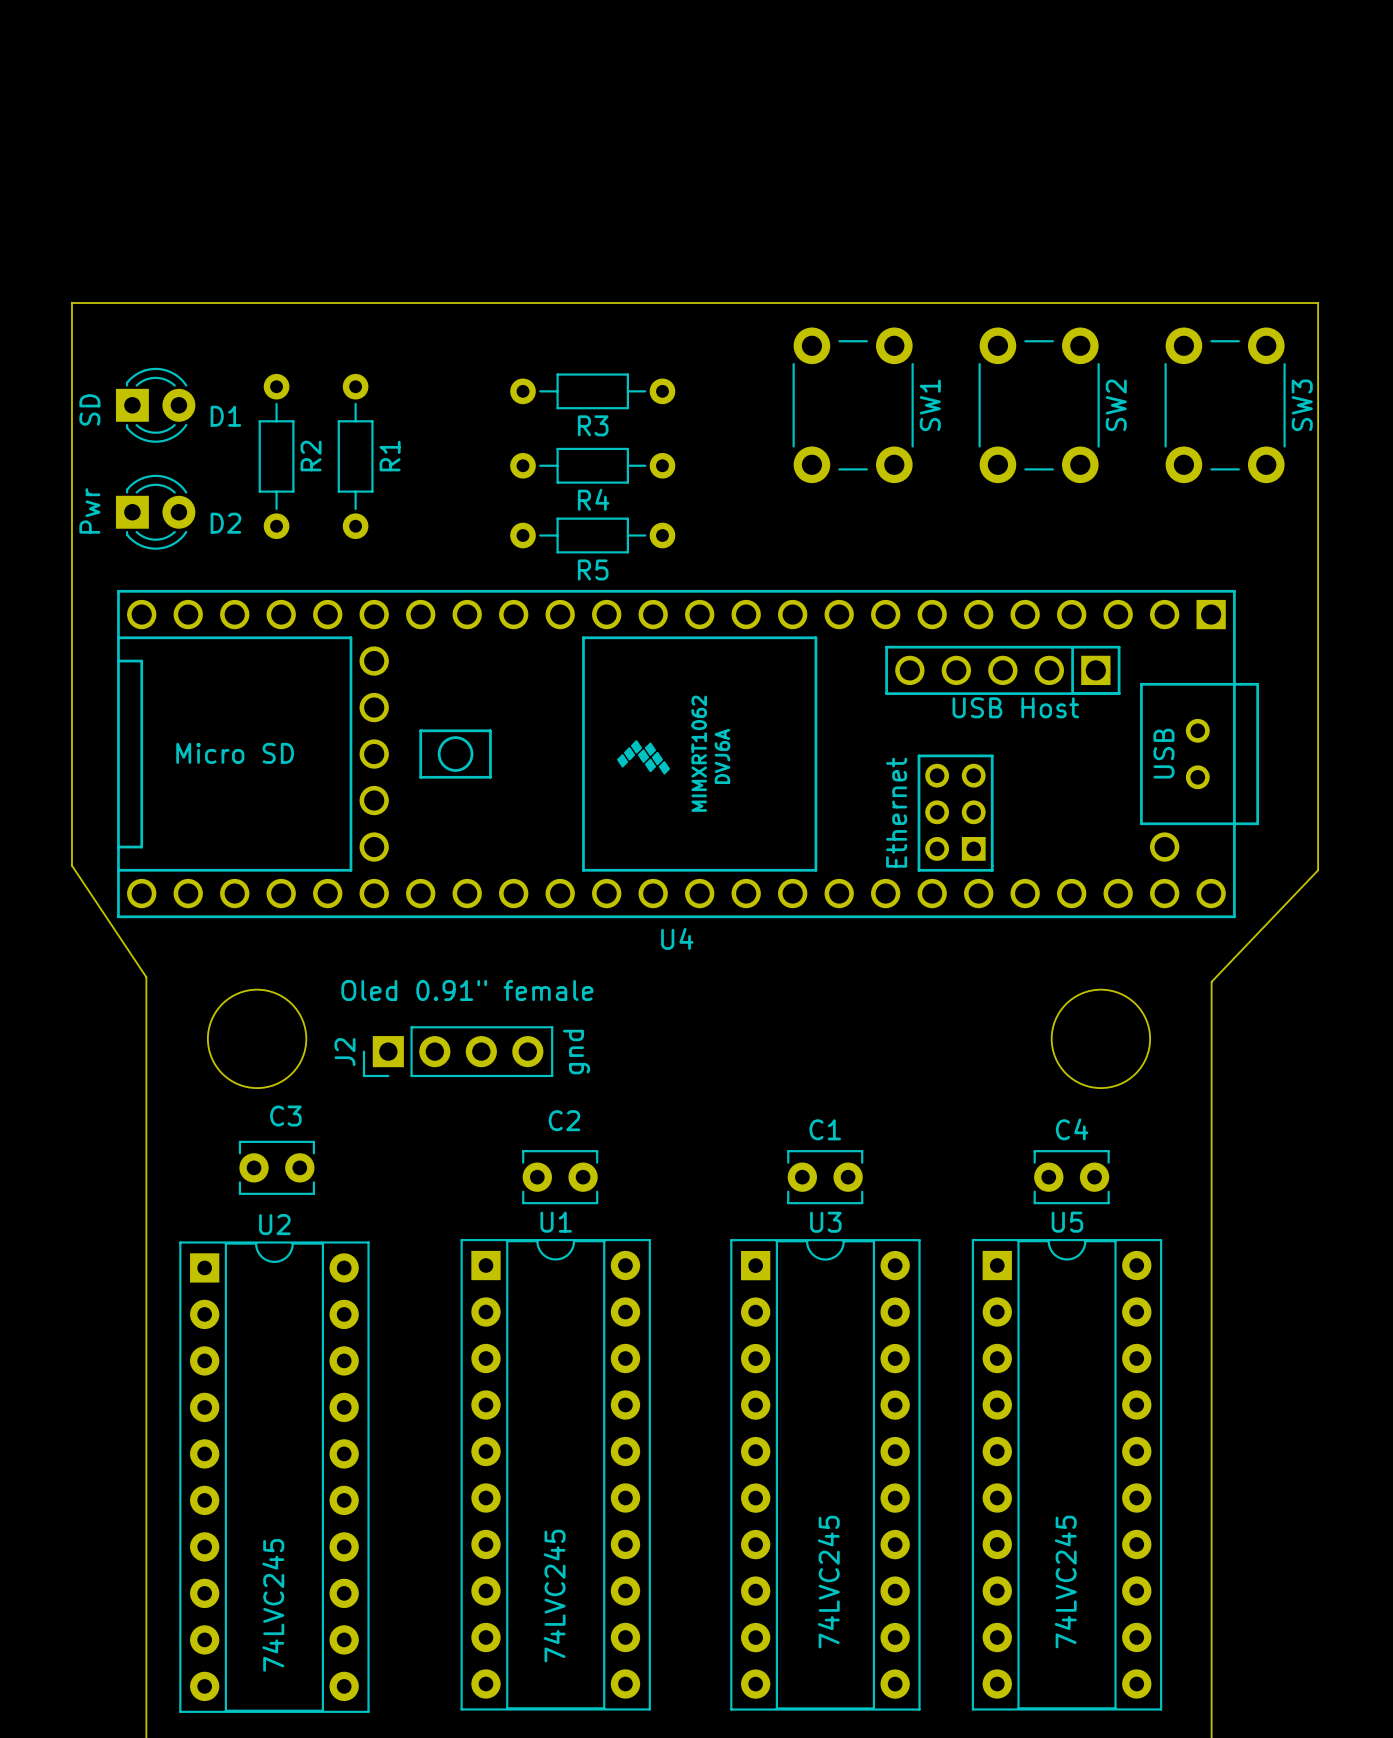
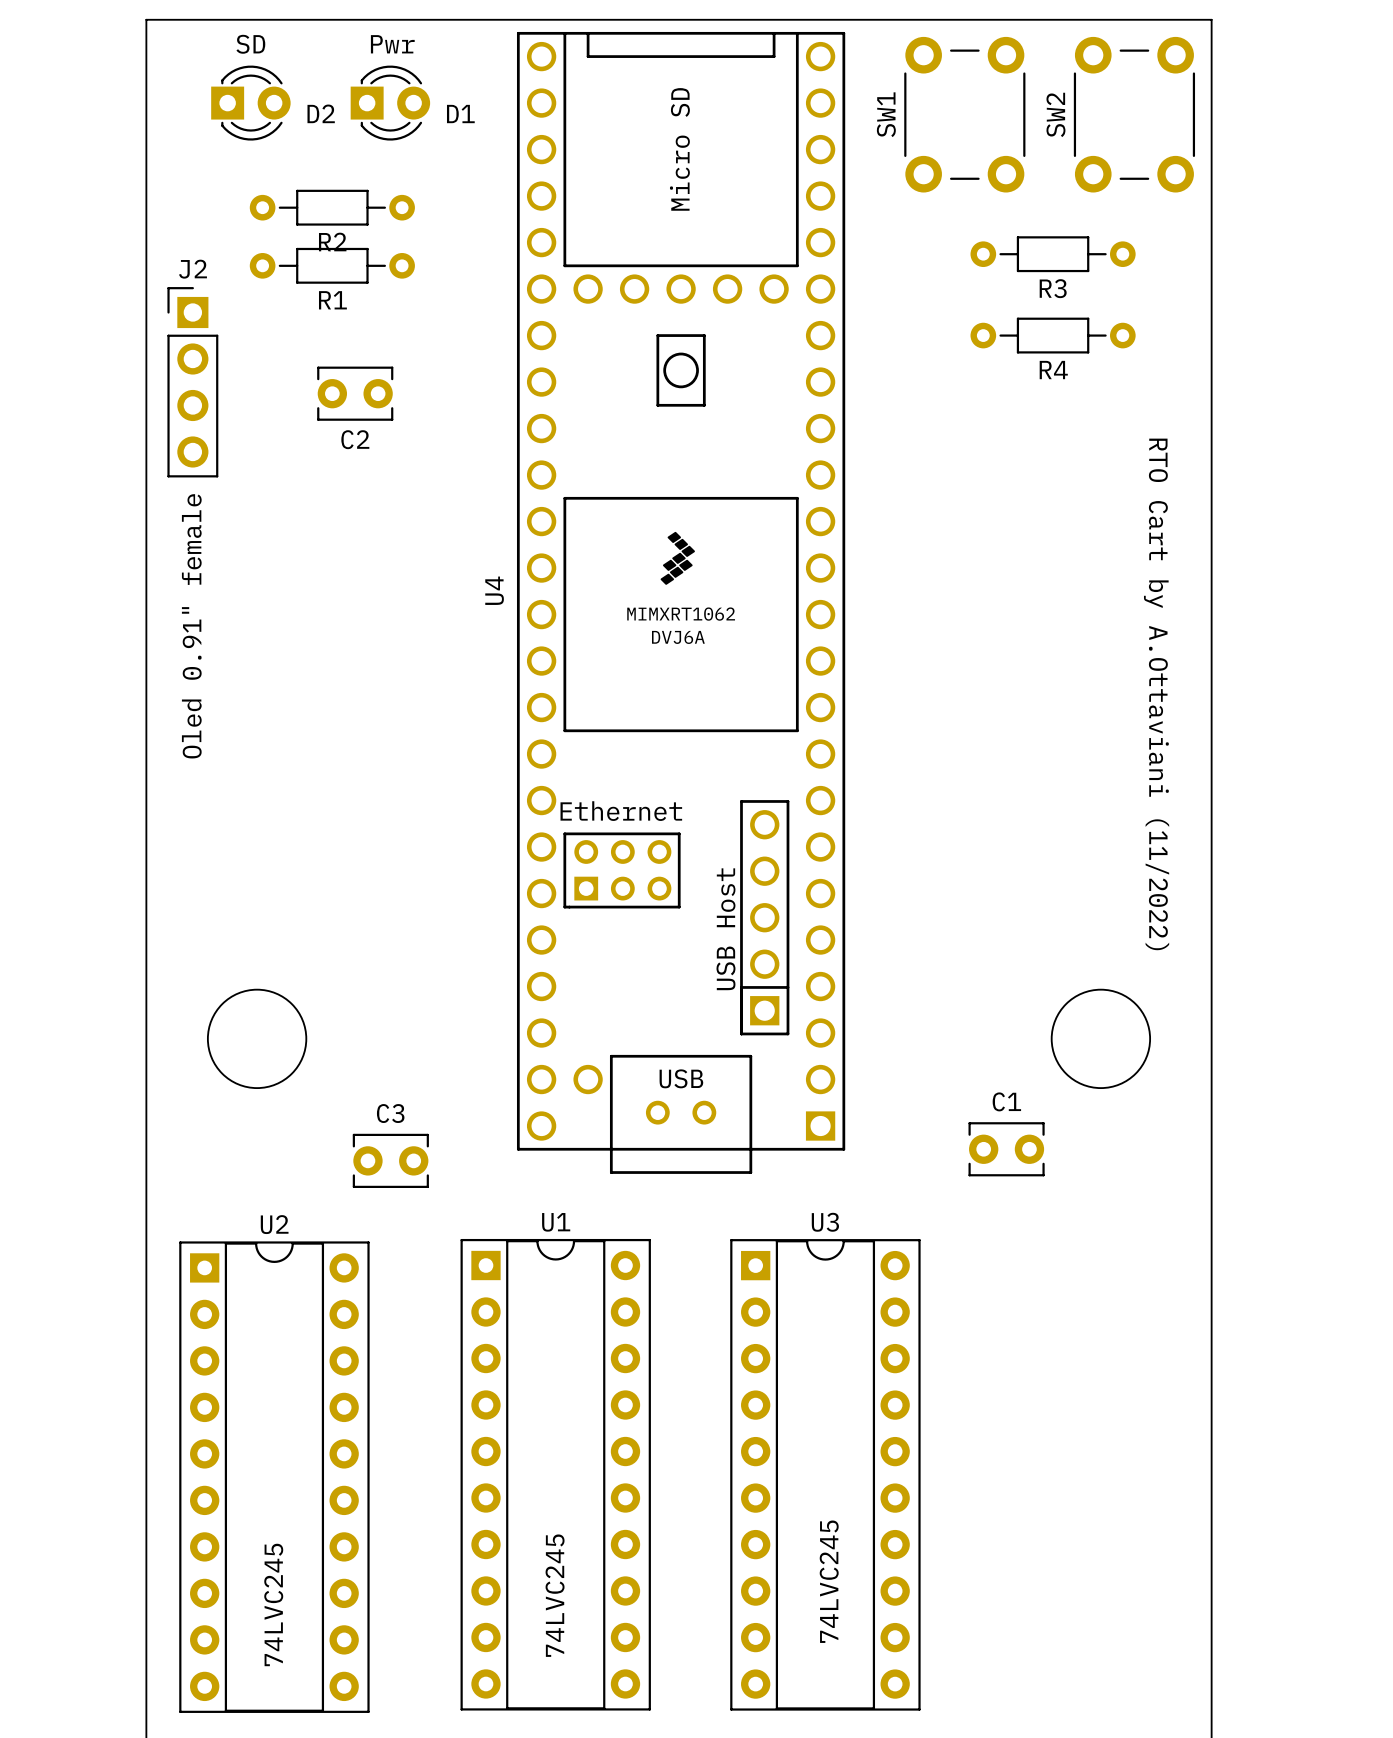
text: none -> Pwr (392, 44)
R3 position: (592, 391) -> (1053, 254)
D1 position: (155, 405) -> (390, 103)
SW1 position: (853, 405) -> (964, 114)
SW1 name position: SW1 (930, 405) -> SW1 (886, 114)
SW2 position: (1039, 405) -> (1134, 114)
SW2 name position: SW2 (1116, 405) -> SW2 (1055, 114)
SW3: (1225, 405) -> none
text rotation: 0° (89, 409) -> 90° clockwise (250, 44)
text position: SD (89, 409) -> SD (250, 44)
R2 rotation: 0° (276, 456) -> 90° clockwise (332, 207)
R2 position: (276, 456) -> (332, 207)
R1 rotation: 0° (355, 456) -> 90° clockwise (332, 265)
R1 position: (355, 456) -> (332, 265)
R4 position: (592, 465) -> (1053, 335)
text: Pwr (89, 510) -> none
D2 position: (155, 512) -> (250, 103)
R5: (592, 535) -> none
text: none -> RTO Cart by A.Ottaviani (11/2022) (1156, 694)
U4 rotation: 0° (688, 754) -> 90° clockwise (681, 602)
board edge: (146, 977) (71, 865) (71, 303) (1318, 303) (1318, 870) (1211, 981) -> (146, 977) (146, 19) (1211, 19) (1211, 981)
J2 value position: Oled 0.91" female (467, 990) -> Oled 0.91" female (191, 626)
J2 rotation: 0° (458, 1051) -> 90° clockwise (192, 382)
J2 position: (458, 1051) -> (192, 382)
text: gnd (576, 1052) -> none
C3 name position: C3 (285, 1116) -> C3 (390, 1113)
C2 name position: C2 (564, 1120) -> C2 (355, 439)
C3 position: (276, 1167) -> (390, 1160)
C2 position: (560, 1177) -> (355, 393)
C1 position: (825, 1177) -> (1006, 1149)
C4: (1071, 1177) -> none
U5: 74LVC245 (1067, 1474) -> none

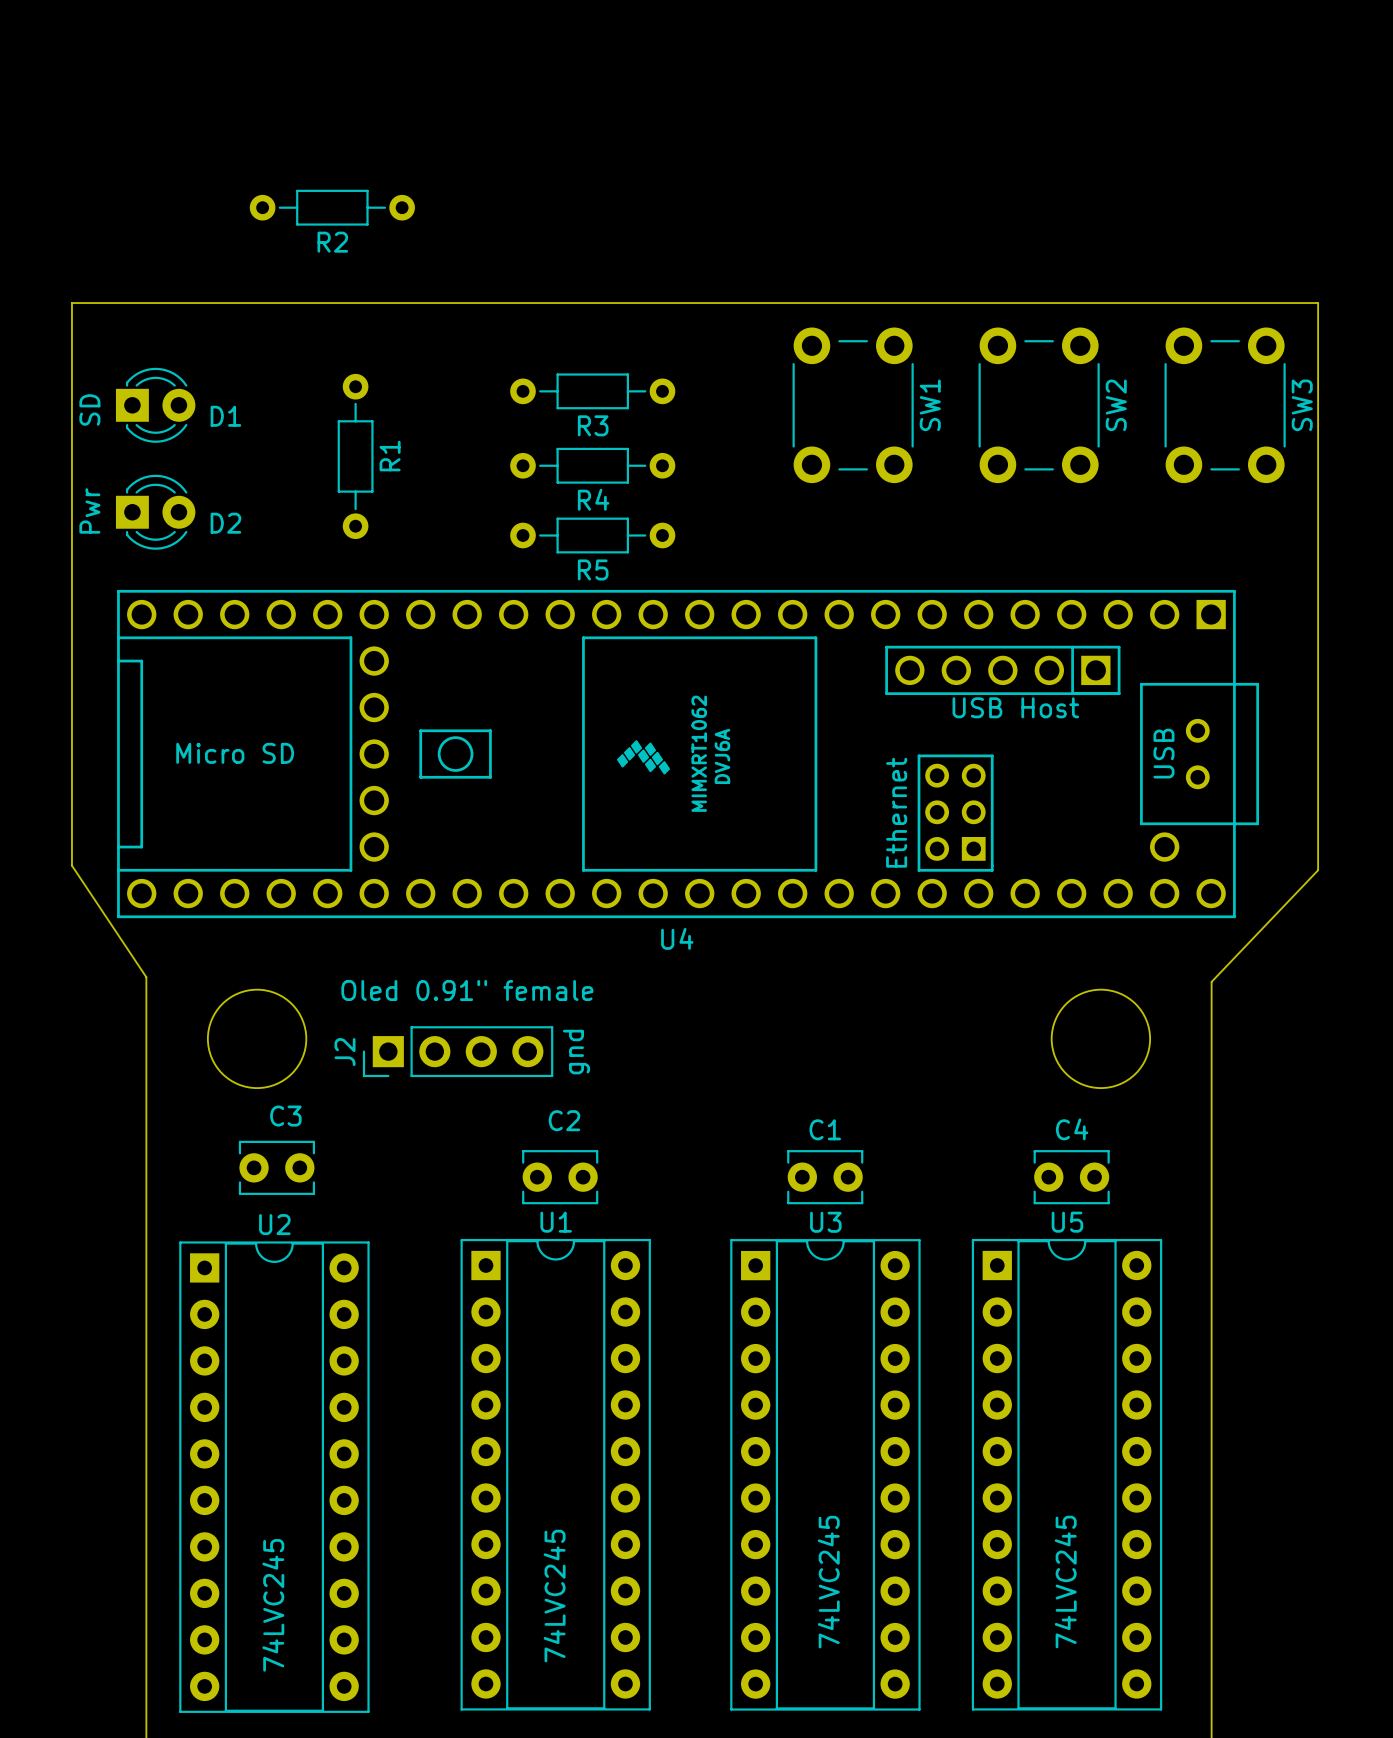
text rotation: 0° (250, 44) -> 90° counterclockwise (89, 409)
text position: SD (250, 44) -> SD (89, 409)
text: Pwr (392, 44) -> none
D2 position: (250, 103) -> (155, 512)
D1 position: (390, 103) -> (155, 405)
SW1 name position: SW1 (886, 114) -> SW1 (930, 405)
SW1 position: (964, 114) -> (853, 405)
SW2 name position: SW2 (1055, 114) -> SW2 (1116, 405)
SW2 position: (1134, 114) -> (1039, 405)
R3 position: (1053, 254) -> (592, 391)
R1 rotation: 0° (332, 265) -> 90° clockwise (355, 456)
R1 position: (332, 265) -> (355, 456)
R1 name position: R1 (332, 300) -> R1 (390, 456)
R4 position: (1053, 335) -> (592, 465)
J2 rotation: 0° (192, 382) -> 90° counterclockwise (458, 1051)
J2 position: (192, 382) -> (458, 1051)
C2 position: (355, 393) -> (560, 1177)
SW3: none -> (1225, 405)
C2 name position: C2 (355, 439) -> C2 (564, 1120)
text: none -> Pwr (89, 510)
R5: none -> (592, 535)
U4 rotation: 0° (681, 602) -> 90° counterclockwise (688, 754)
J2 value position: Oled 0.91" female (191, 626) -> Oled 0.91" female (467, 990)
text: RTO Cart by A.Ottaviani (11/2022) (1156, 694) -> none
board edge: (146, 977) (146, 19) (1211, 19) (1211, 981) -> (146, 977) (71, 865) (71, 303) (1318, 303) (1318, 870) (1211, 981)
text: none -> gnd (576, 1052)
C3 name position: C3 (390, 1113) -> C3 (285, 1116)
C1 position: (1006, 1149) -> (825, 1177)
C3 position: (390, 1160) -> (276, 1167)
C4: none -> (1071, 1177)
U5: none -> 74LVC245 (1067, 1474)

